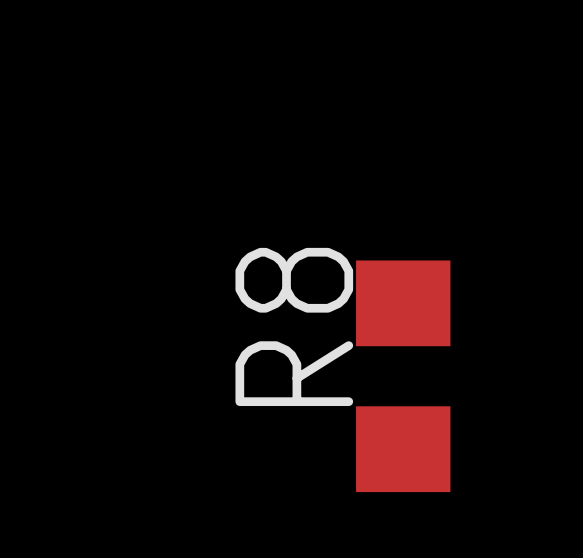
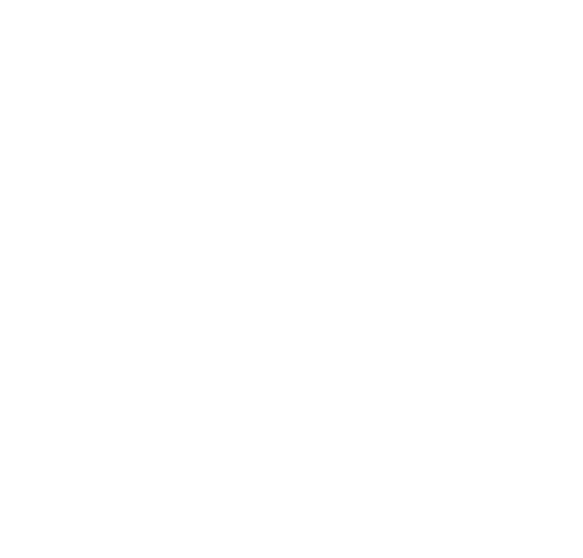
R8: (403, 376) -> none

